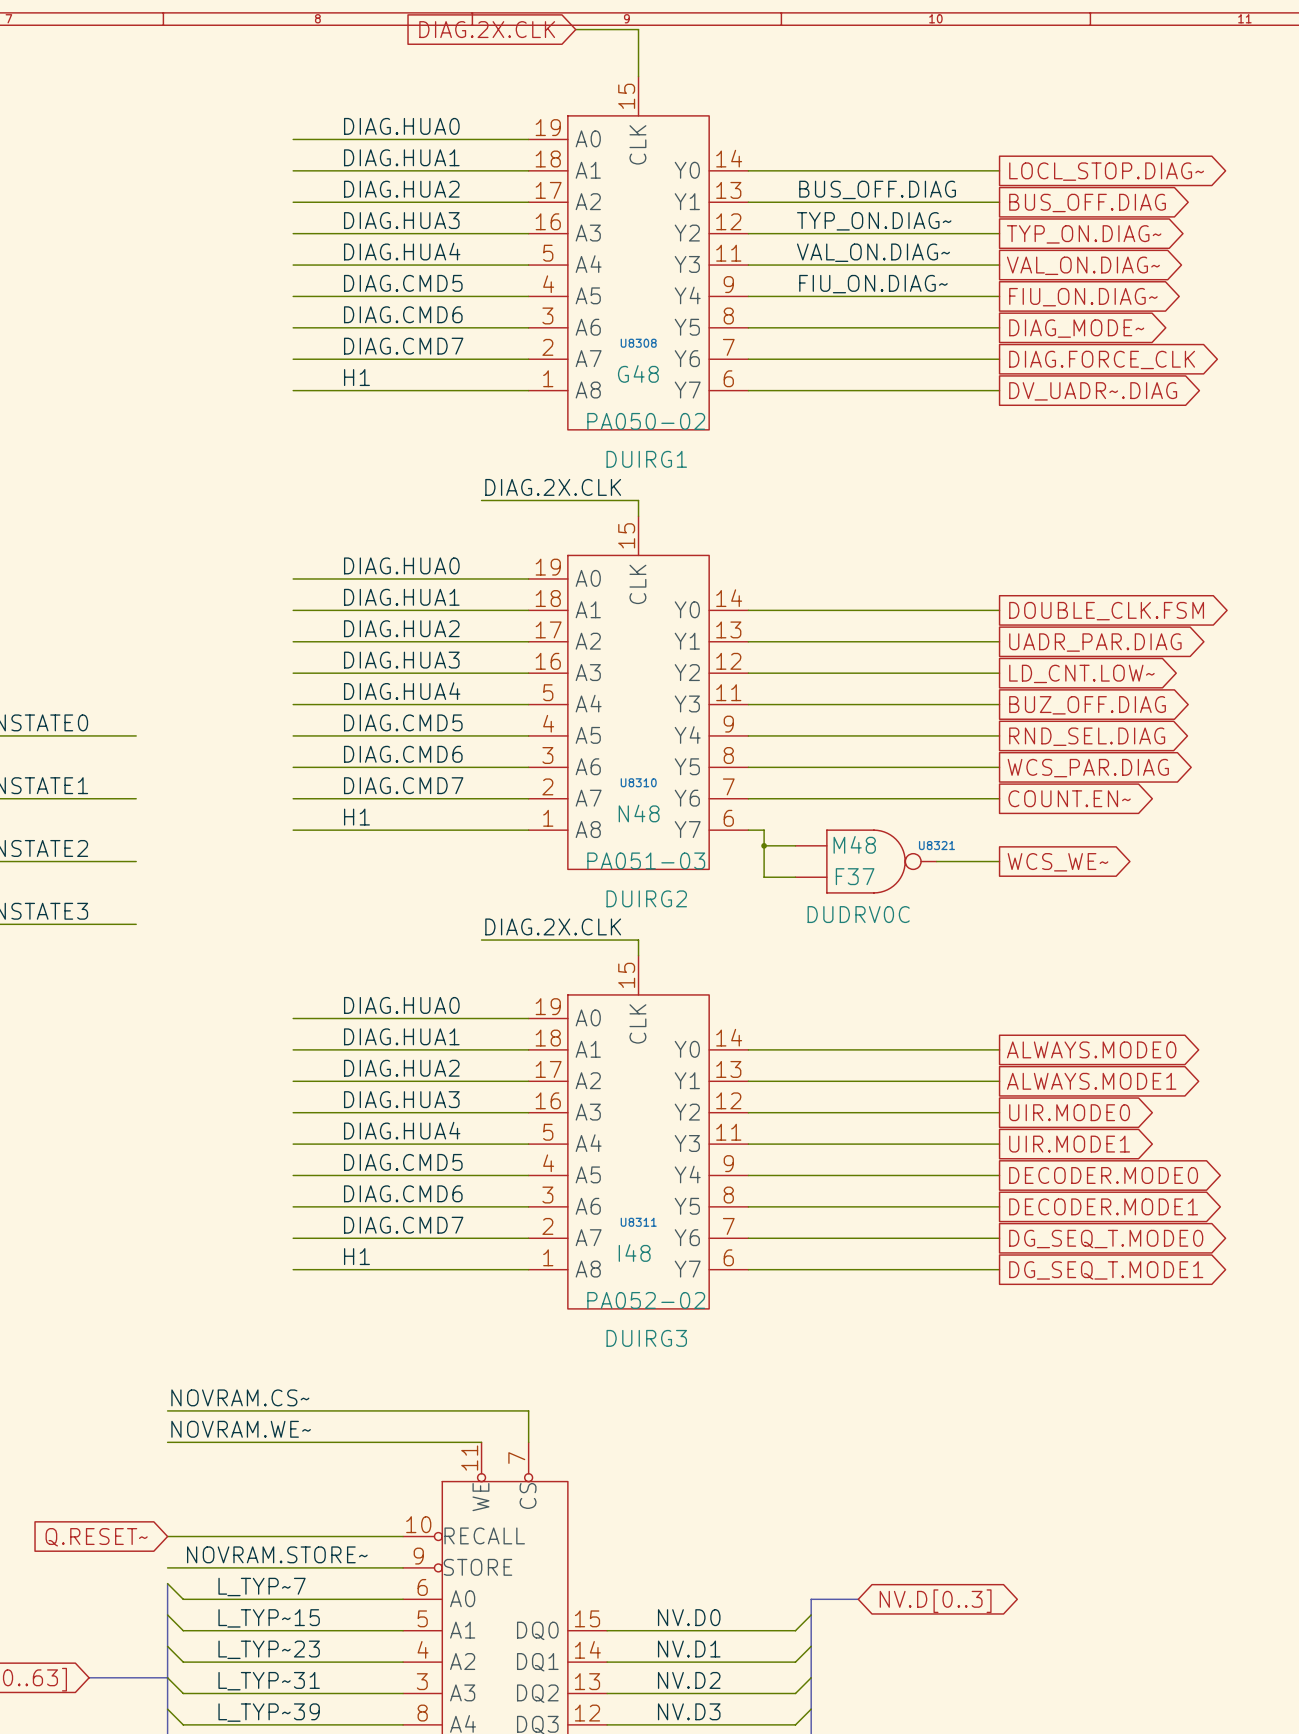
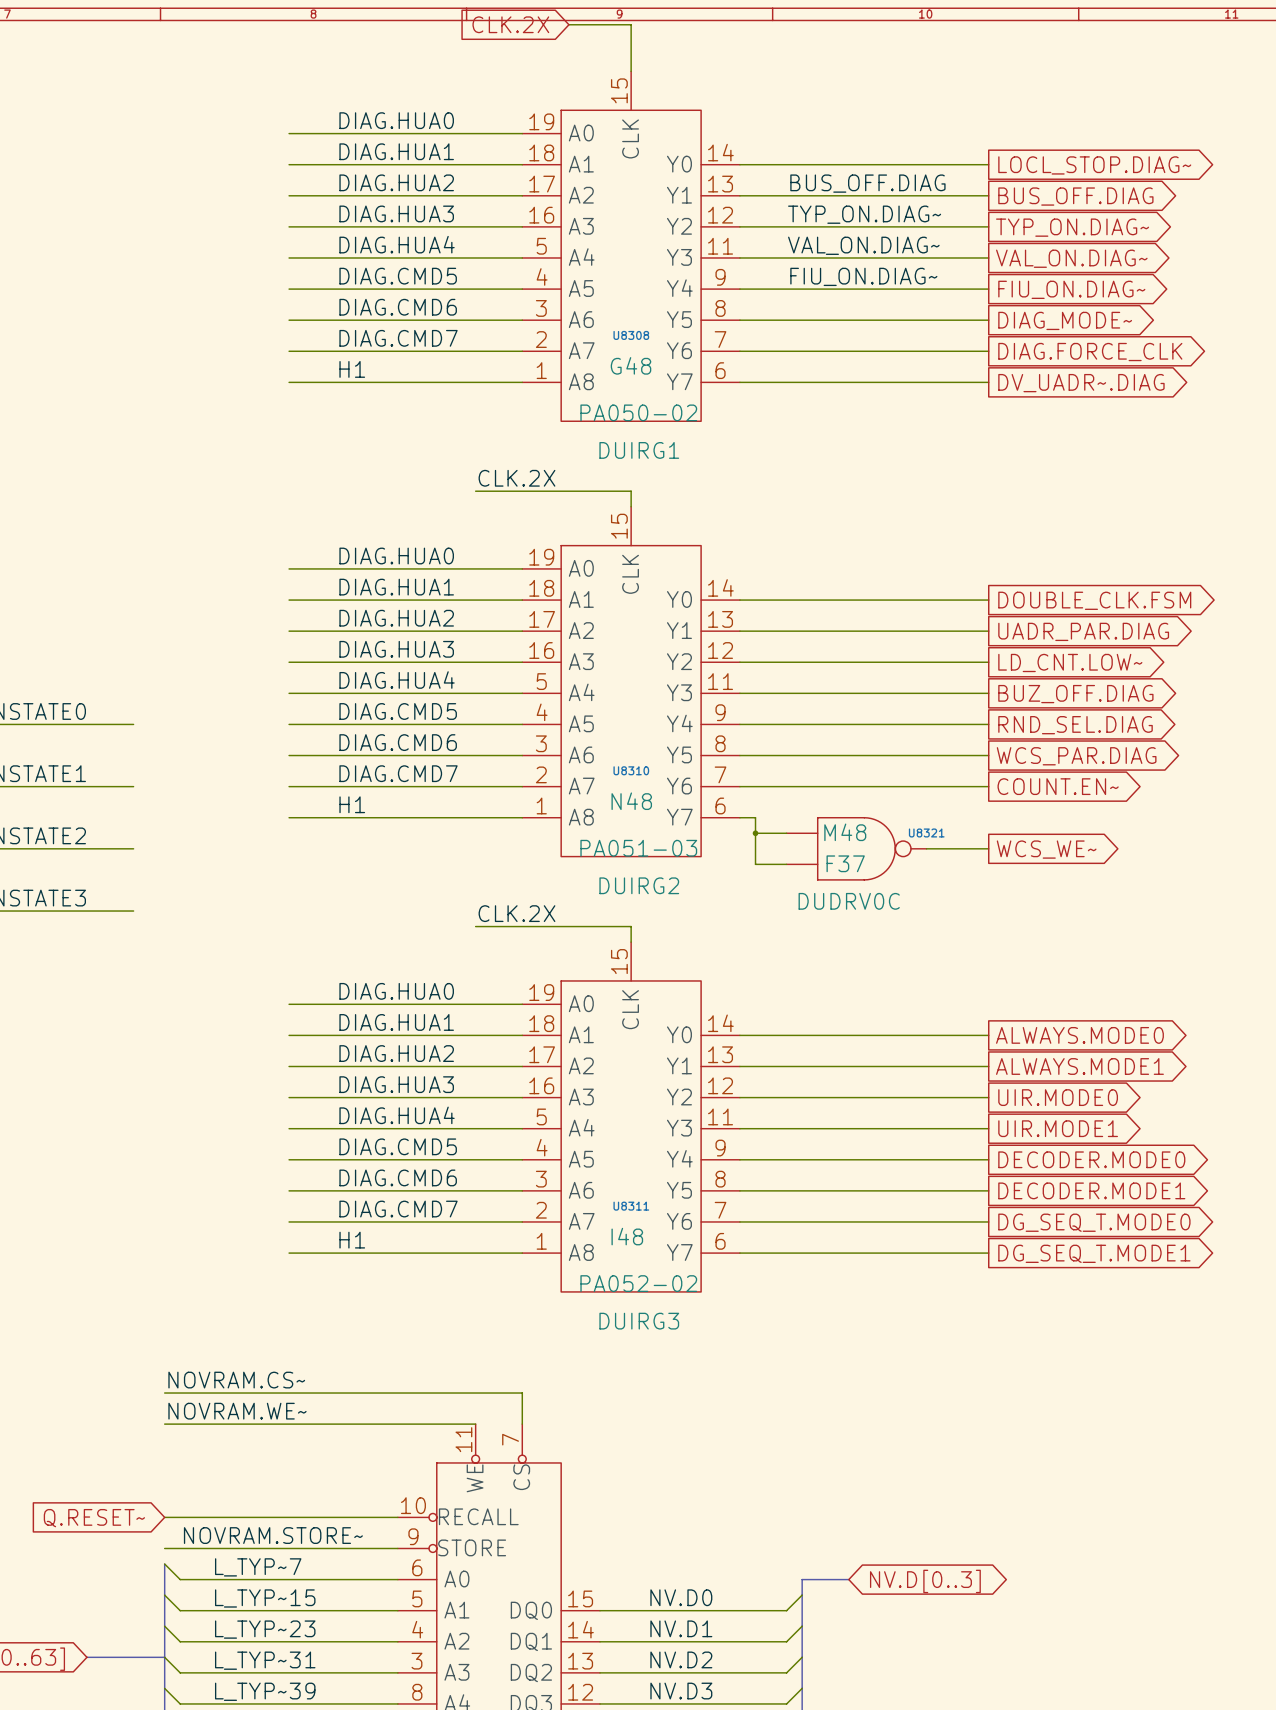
global label: DIAG.2X.CLK (487, 29) -> CLK.2X (510, 24)
label: DIAG.2X.CLK (553, 487) -> CLK.2X (516, 478)
label: DIAG.2X.CLK (553, 926) -> CLK.2X (516, 913)

